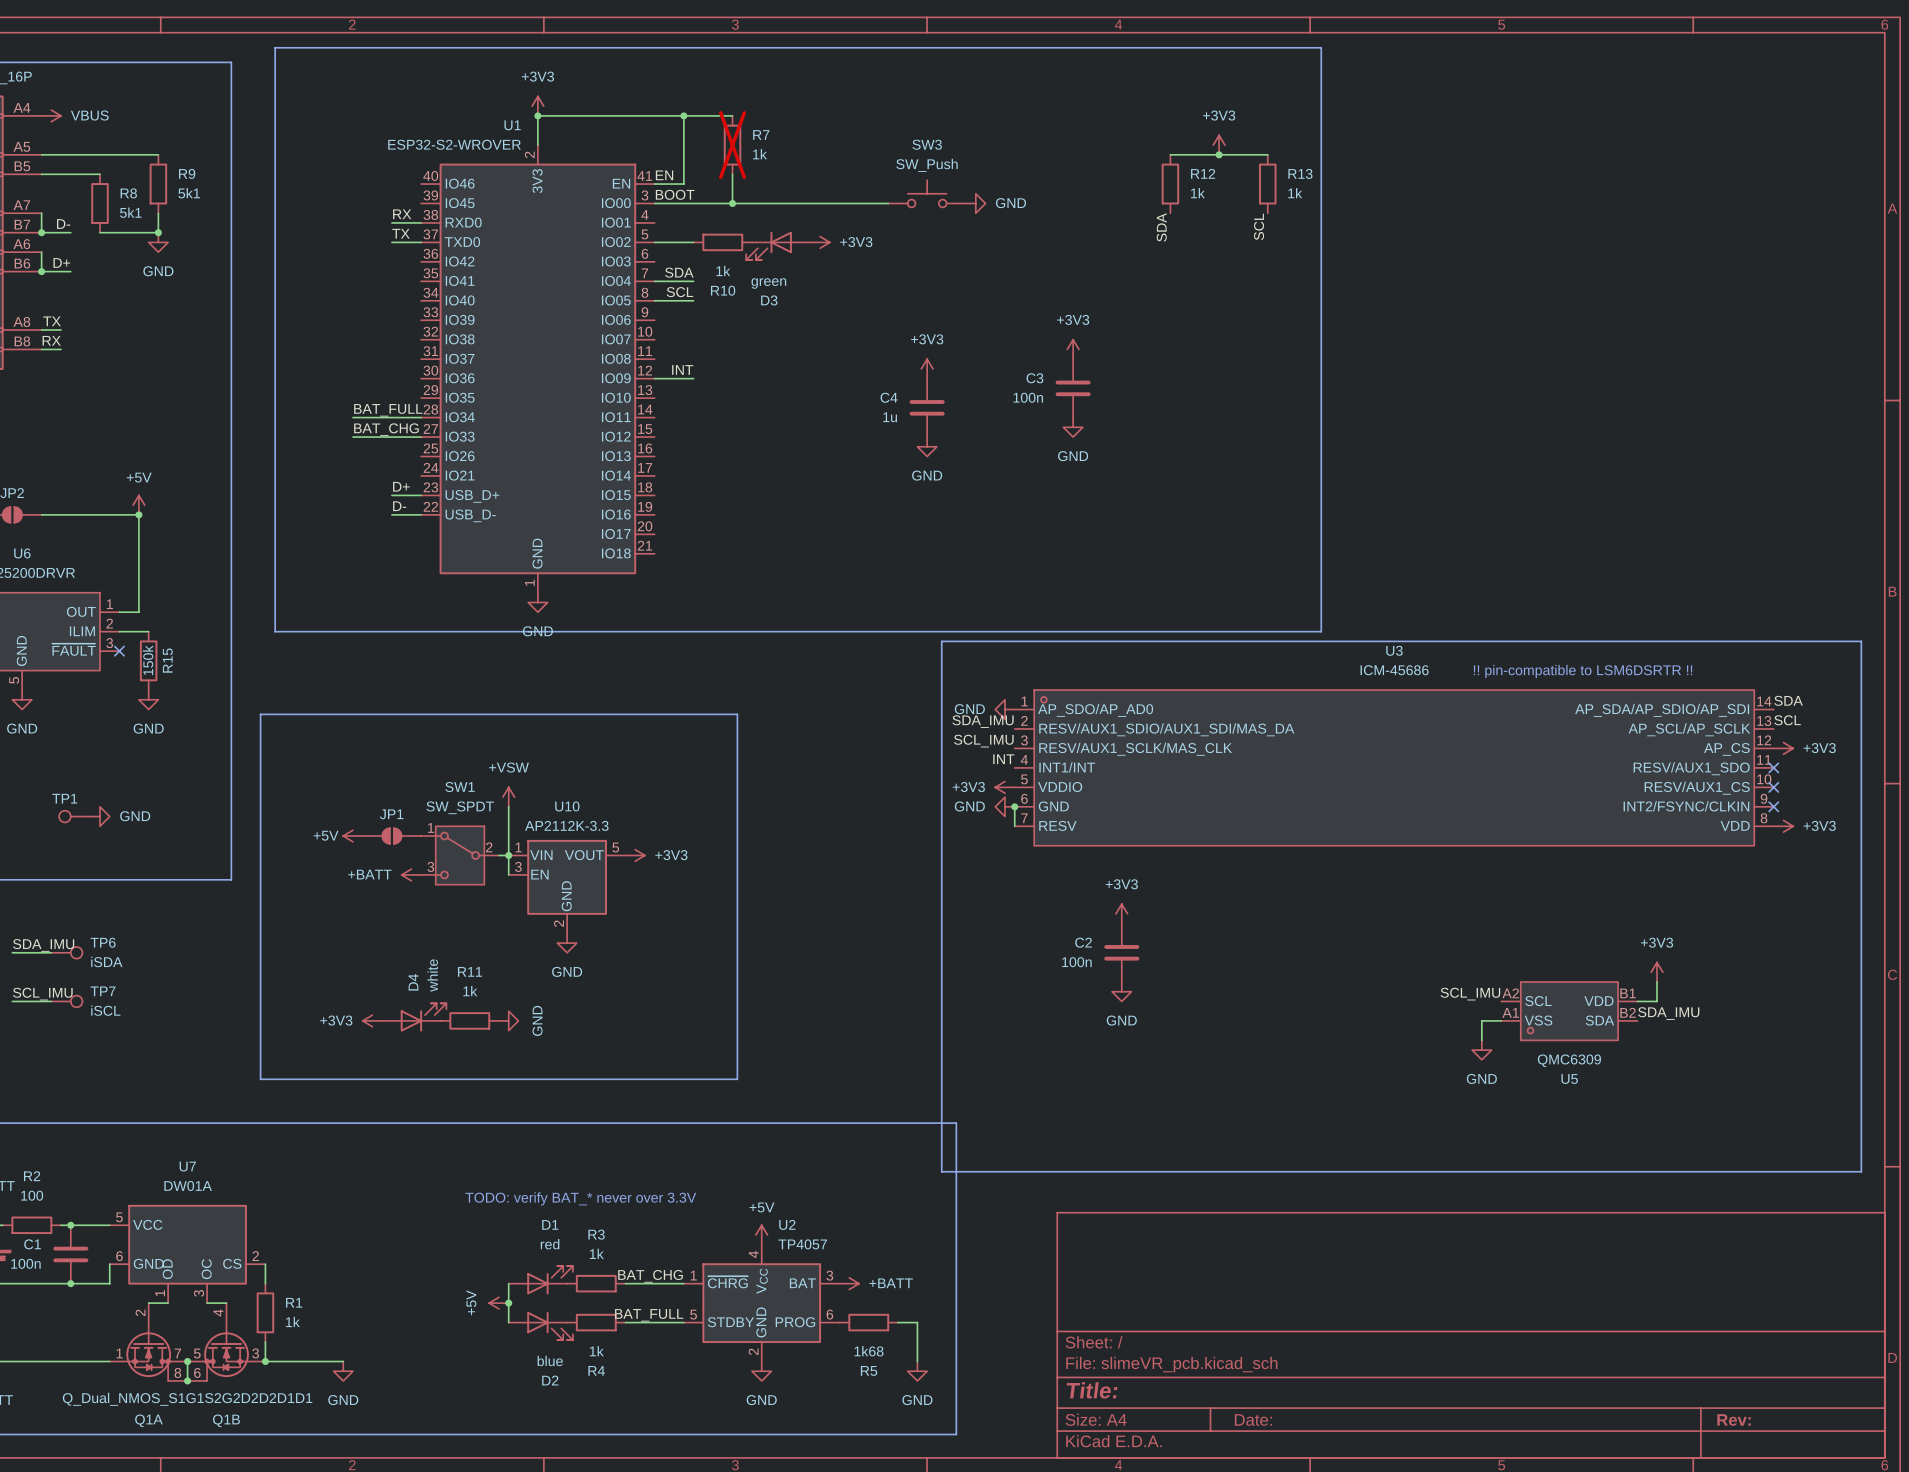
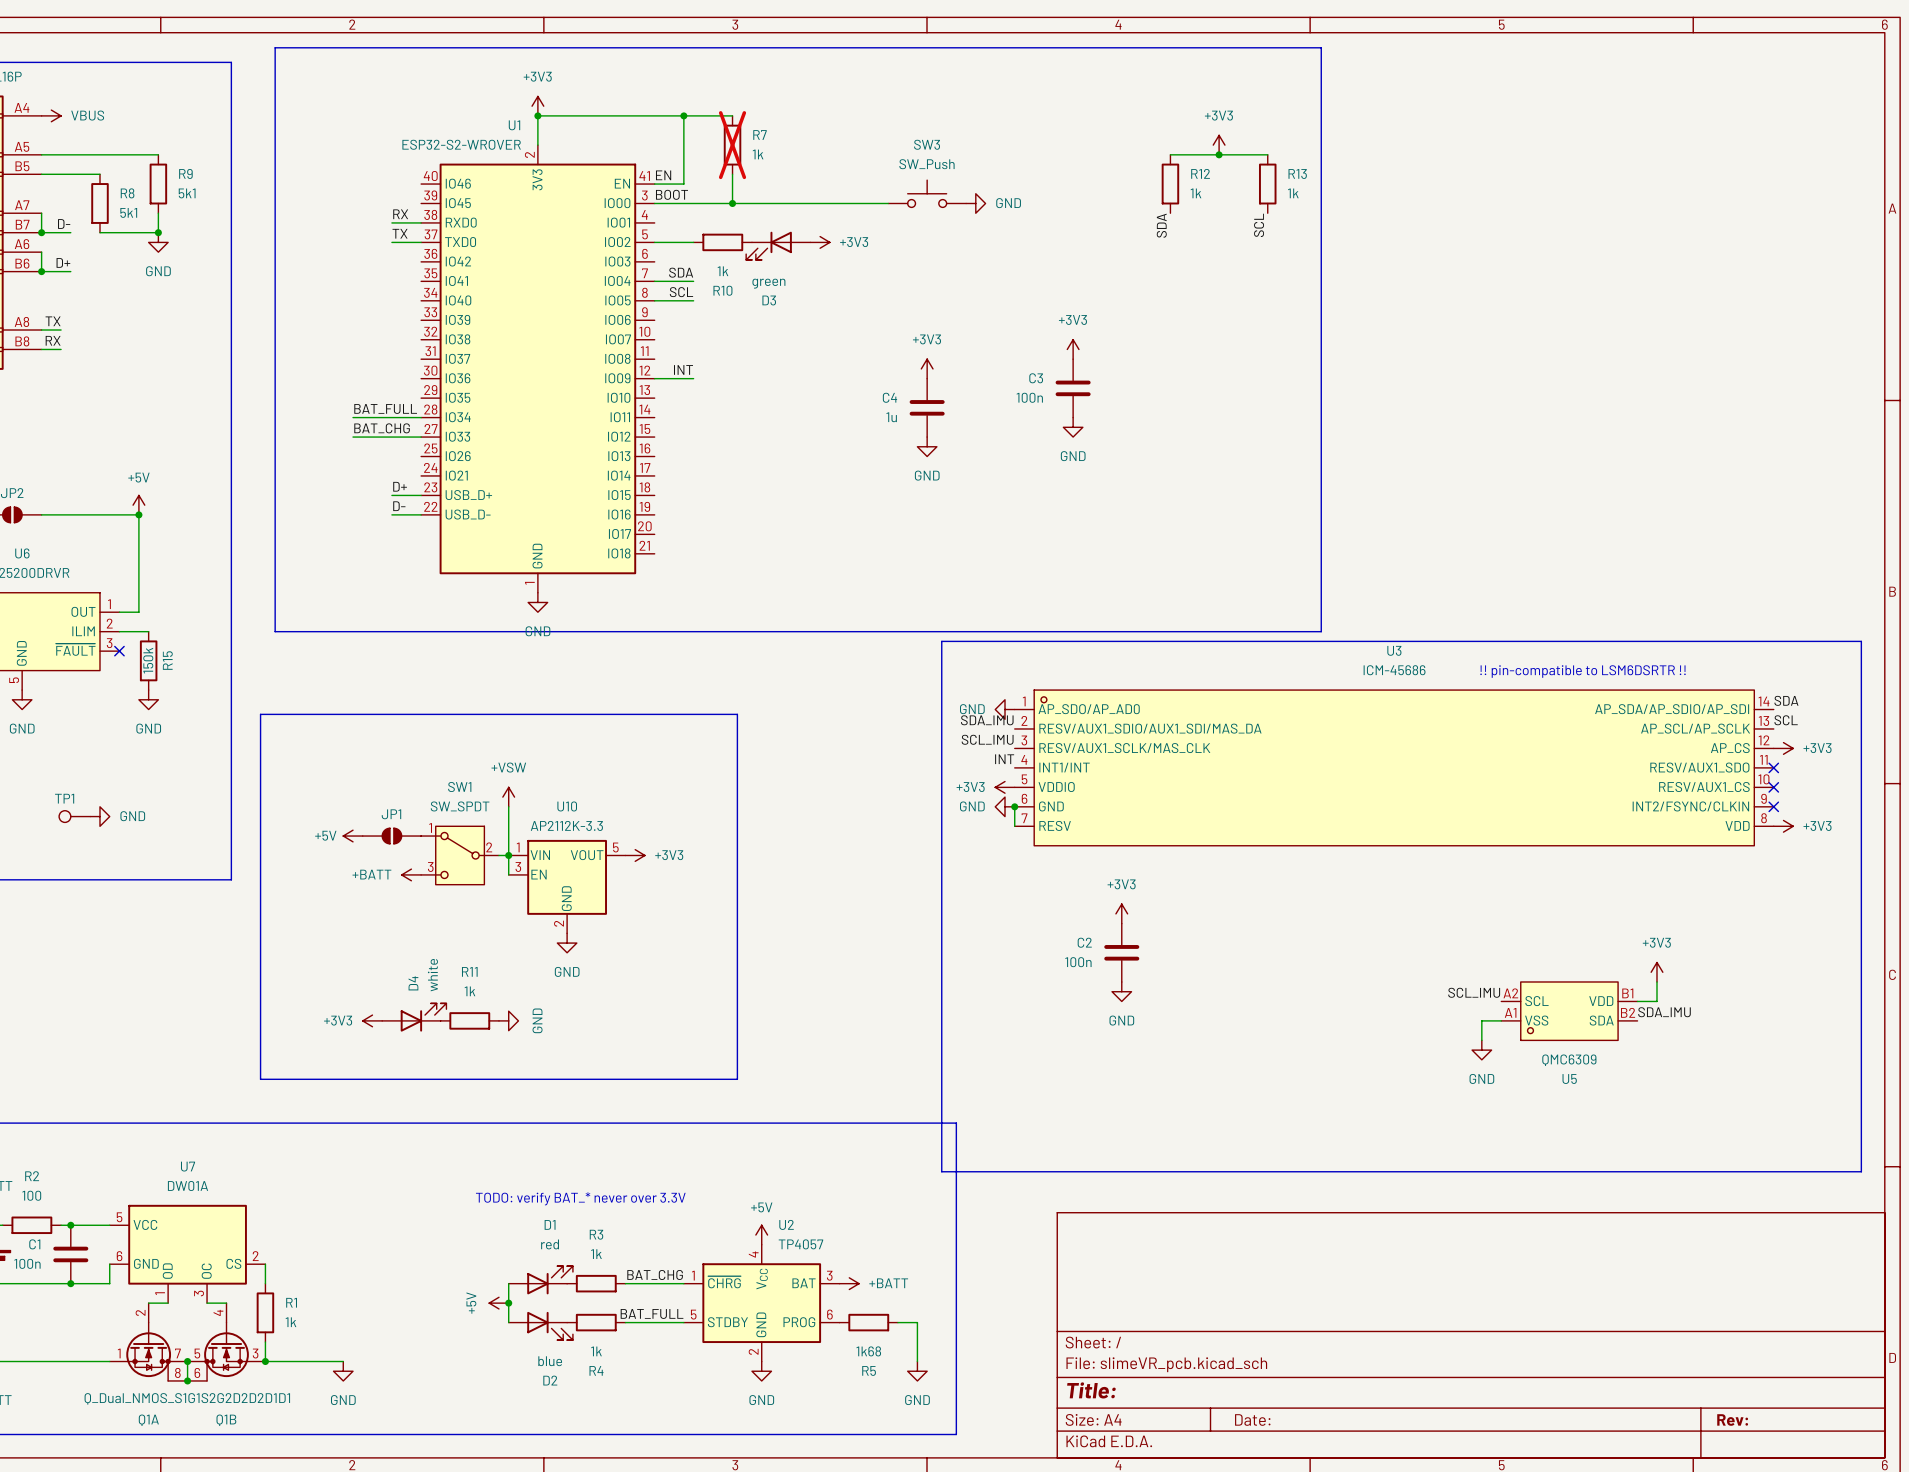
label: SDA_IMU (43, 945) -> none
wire: (12, 952) (51, 952) -> none
TP6: iSDA (66, 952) -> none
label: SCL_IMU (42, 994) -> none
wire: (12, 1001) (51, 1001) -> none
TP7: iSCL (66, 1001) -> none

